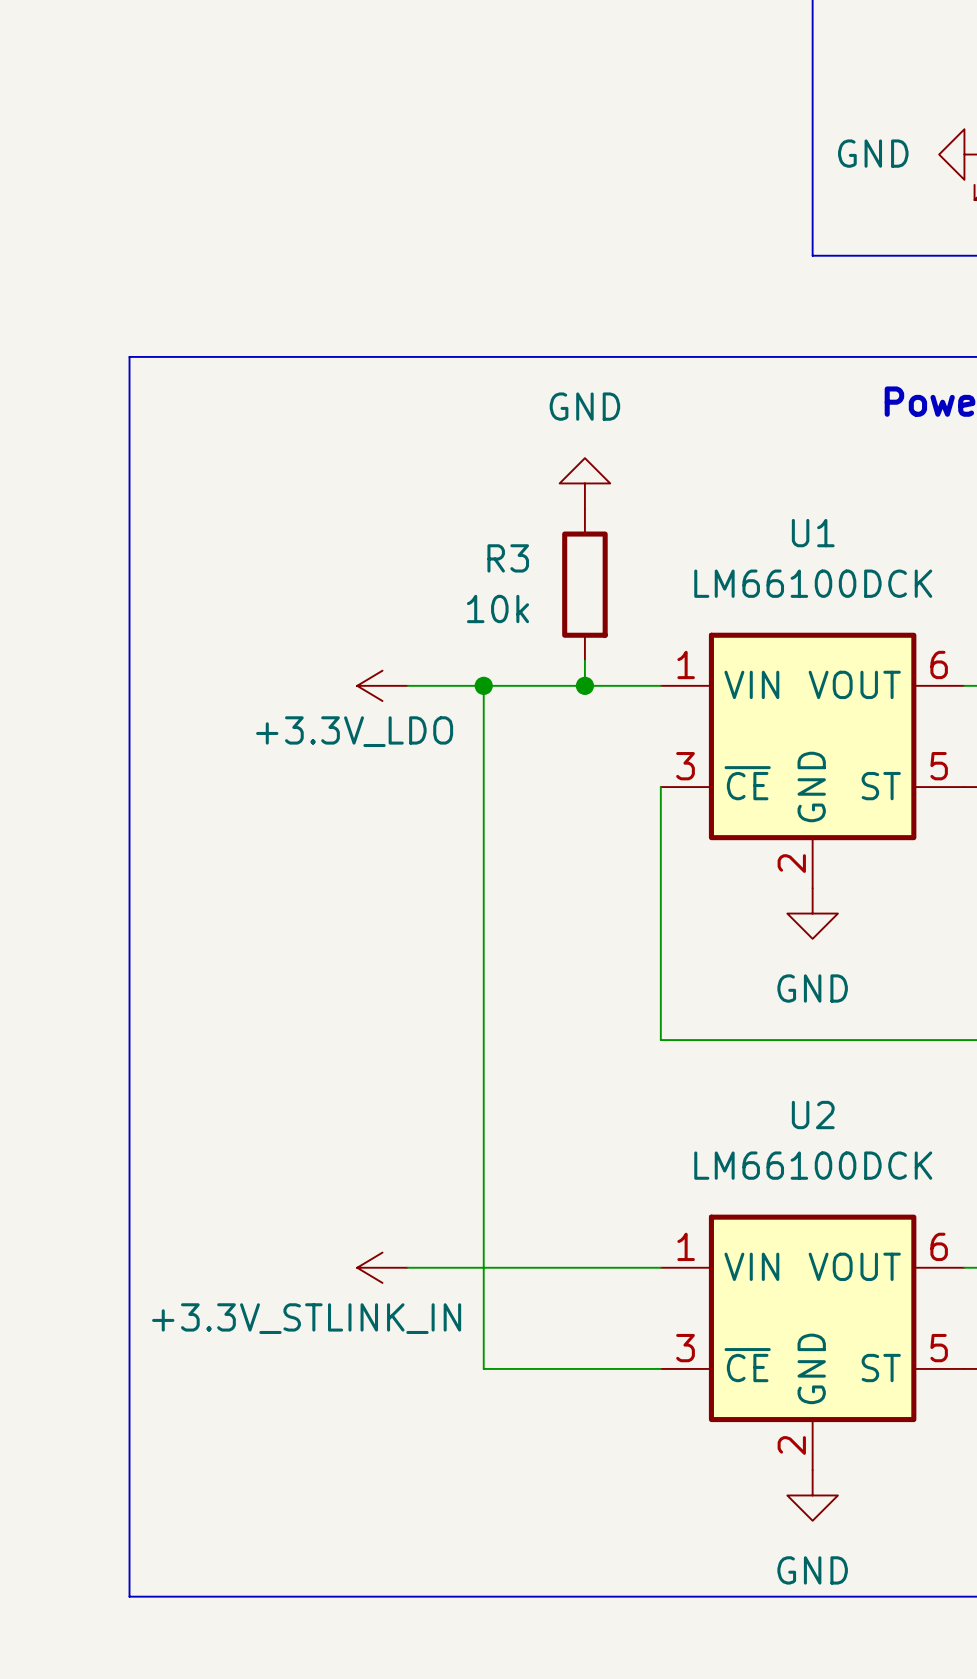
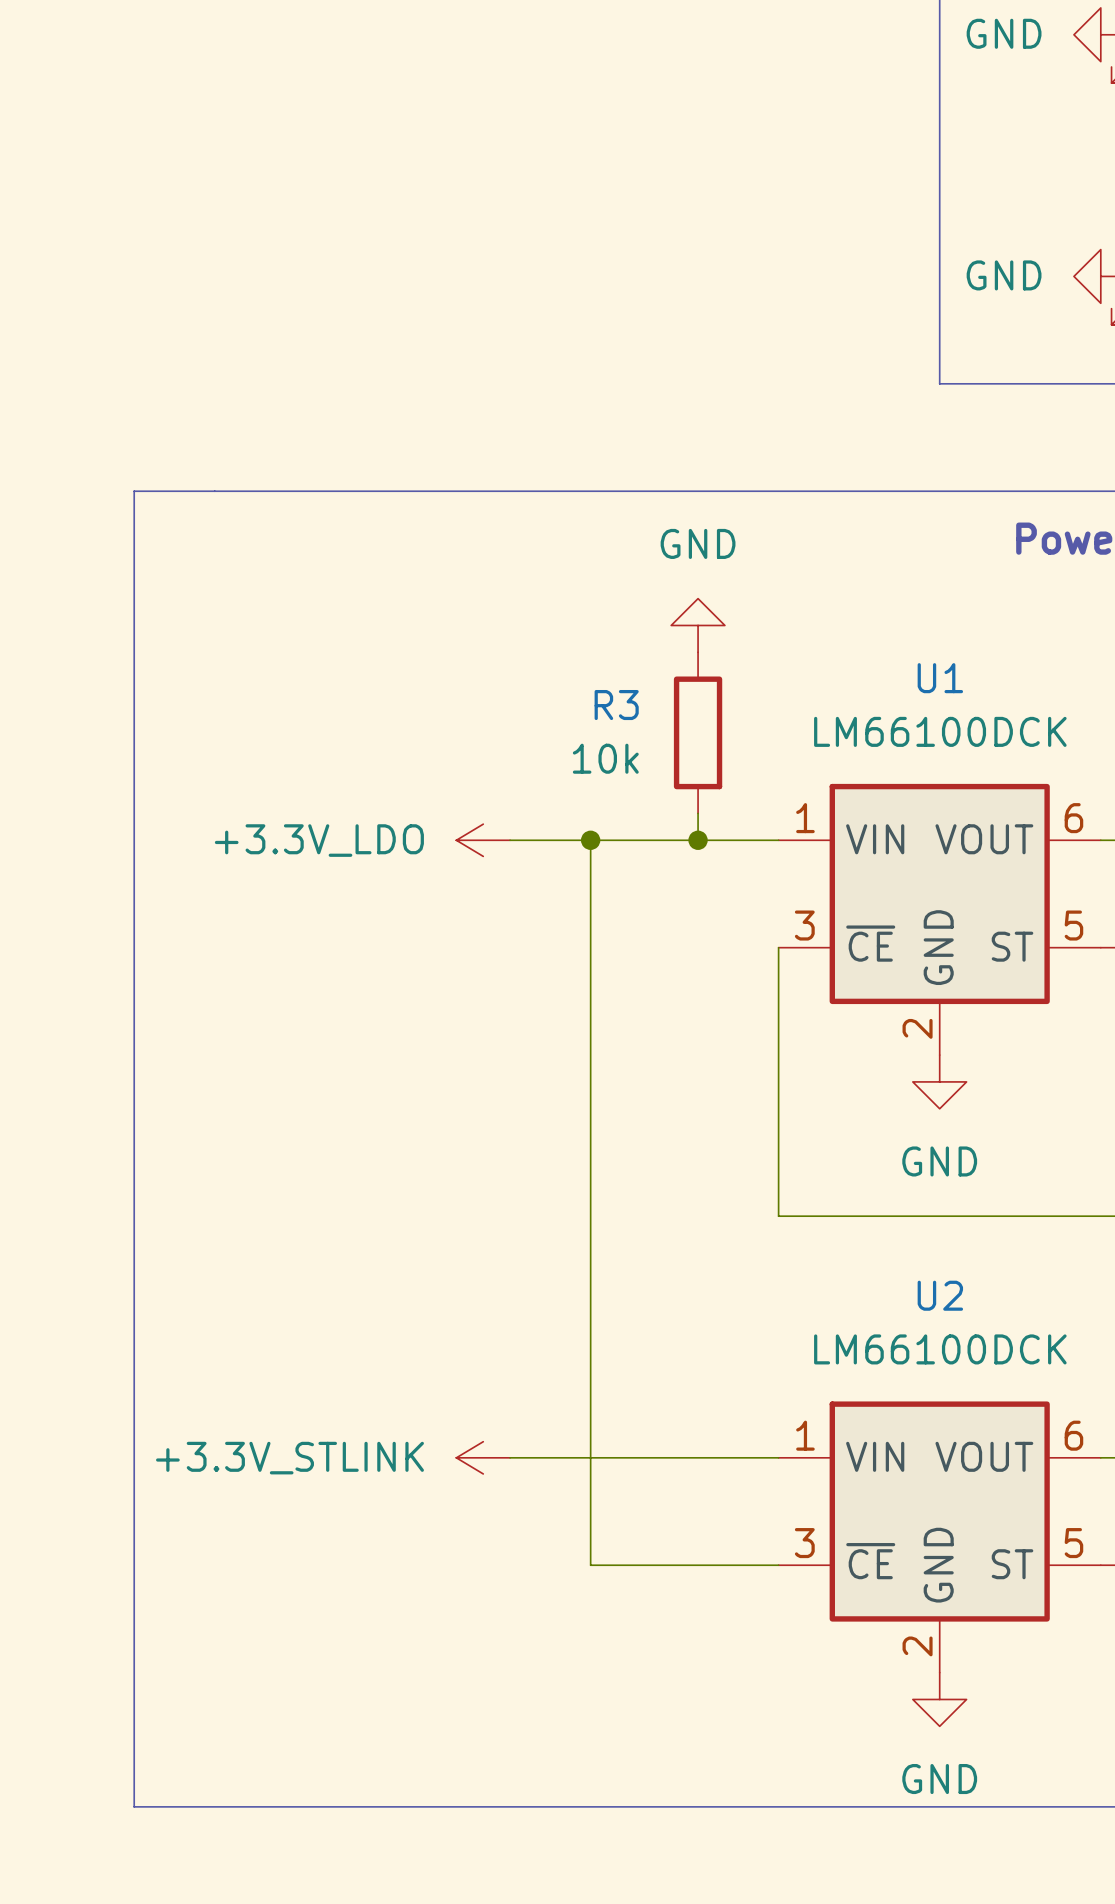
line: (129, 356) (129, 1596) -> (214, 491) (134, 491) (134, 1806) (214, 1806)
power symbol text position: +3.3V_LDO (354, 731) -> +3.3V_LDO (319, 840)
power symbol: +3.3V_STLINK_IN (382, 1267) -> +3.3V_STLINK (483, 1457)

